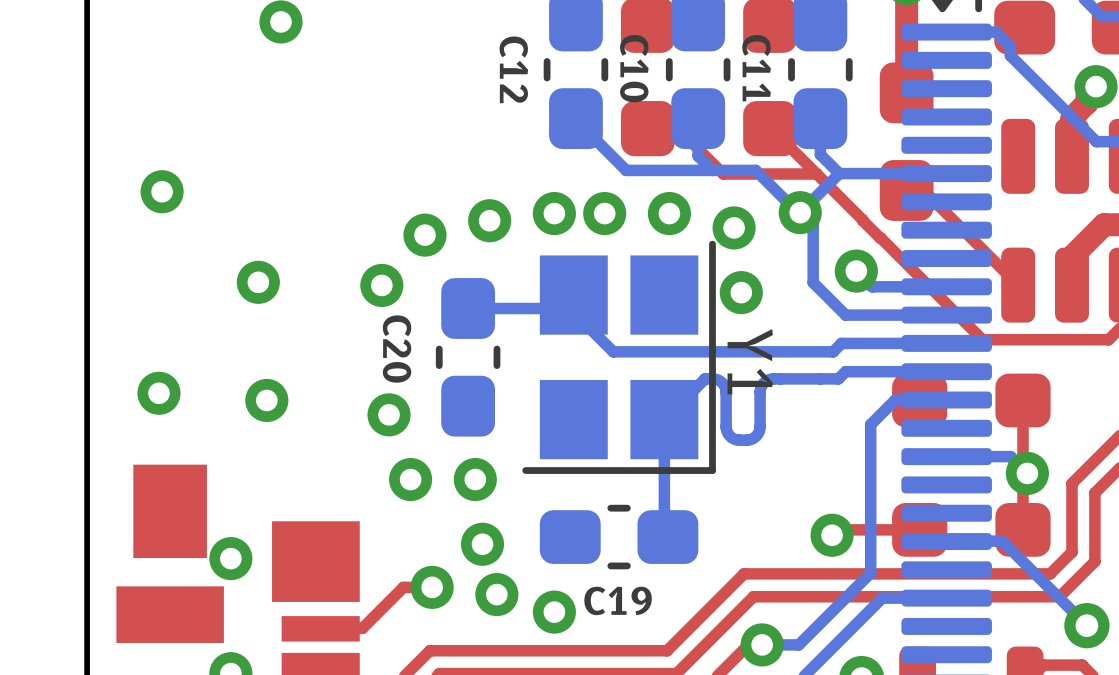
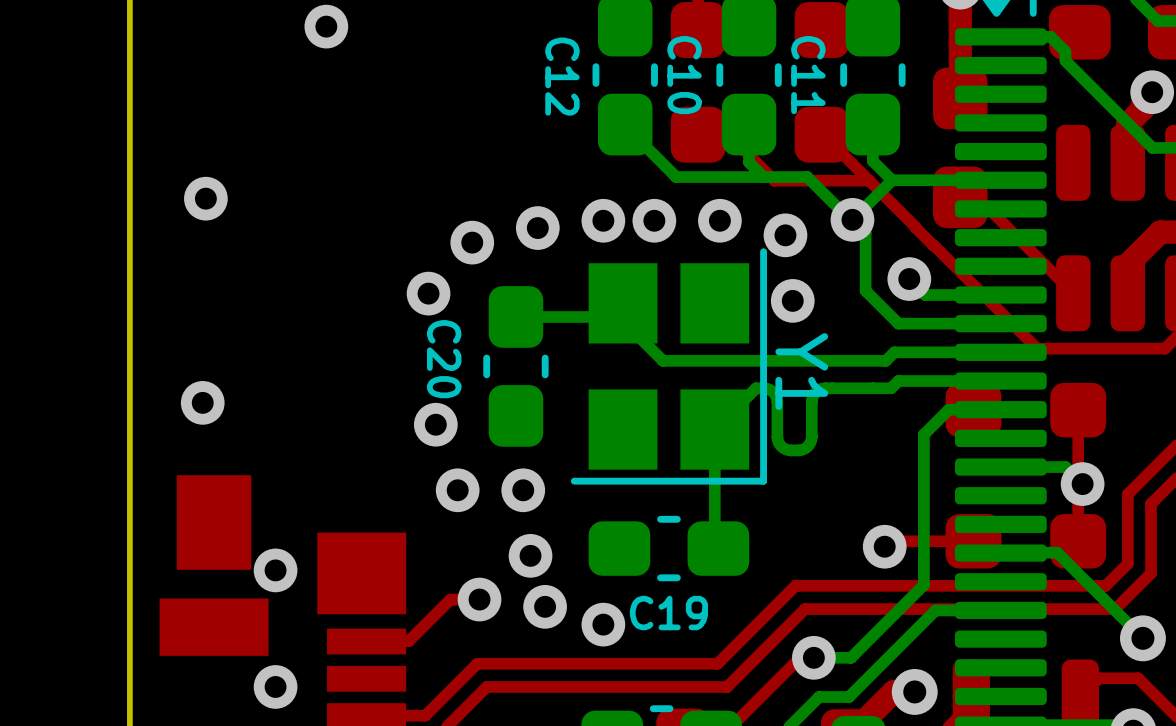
via: (258, 282) -> none
via: (266, 400) -> none

